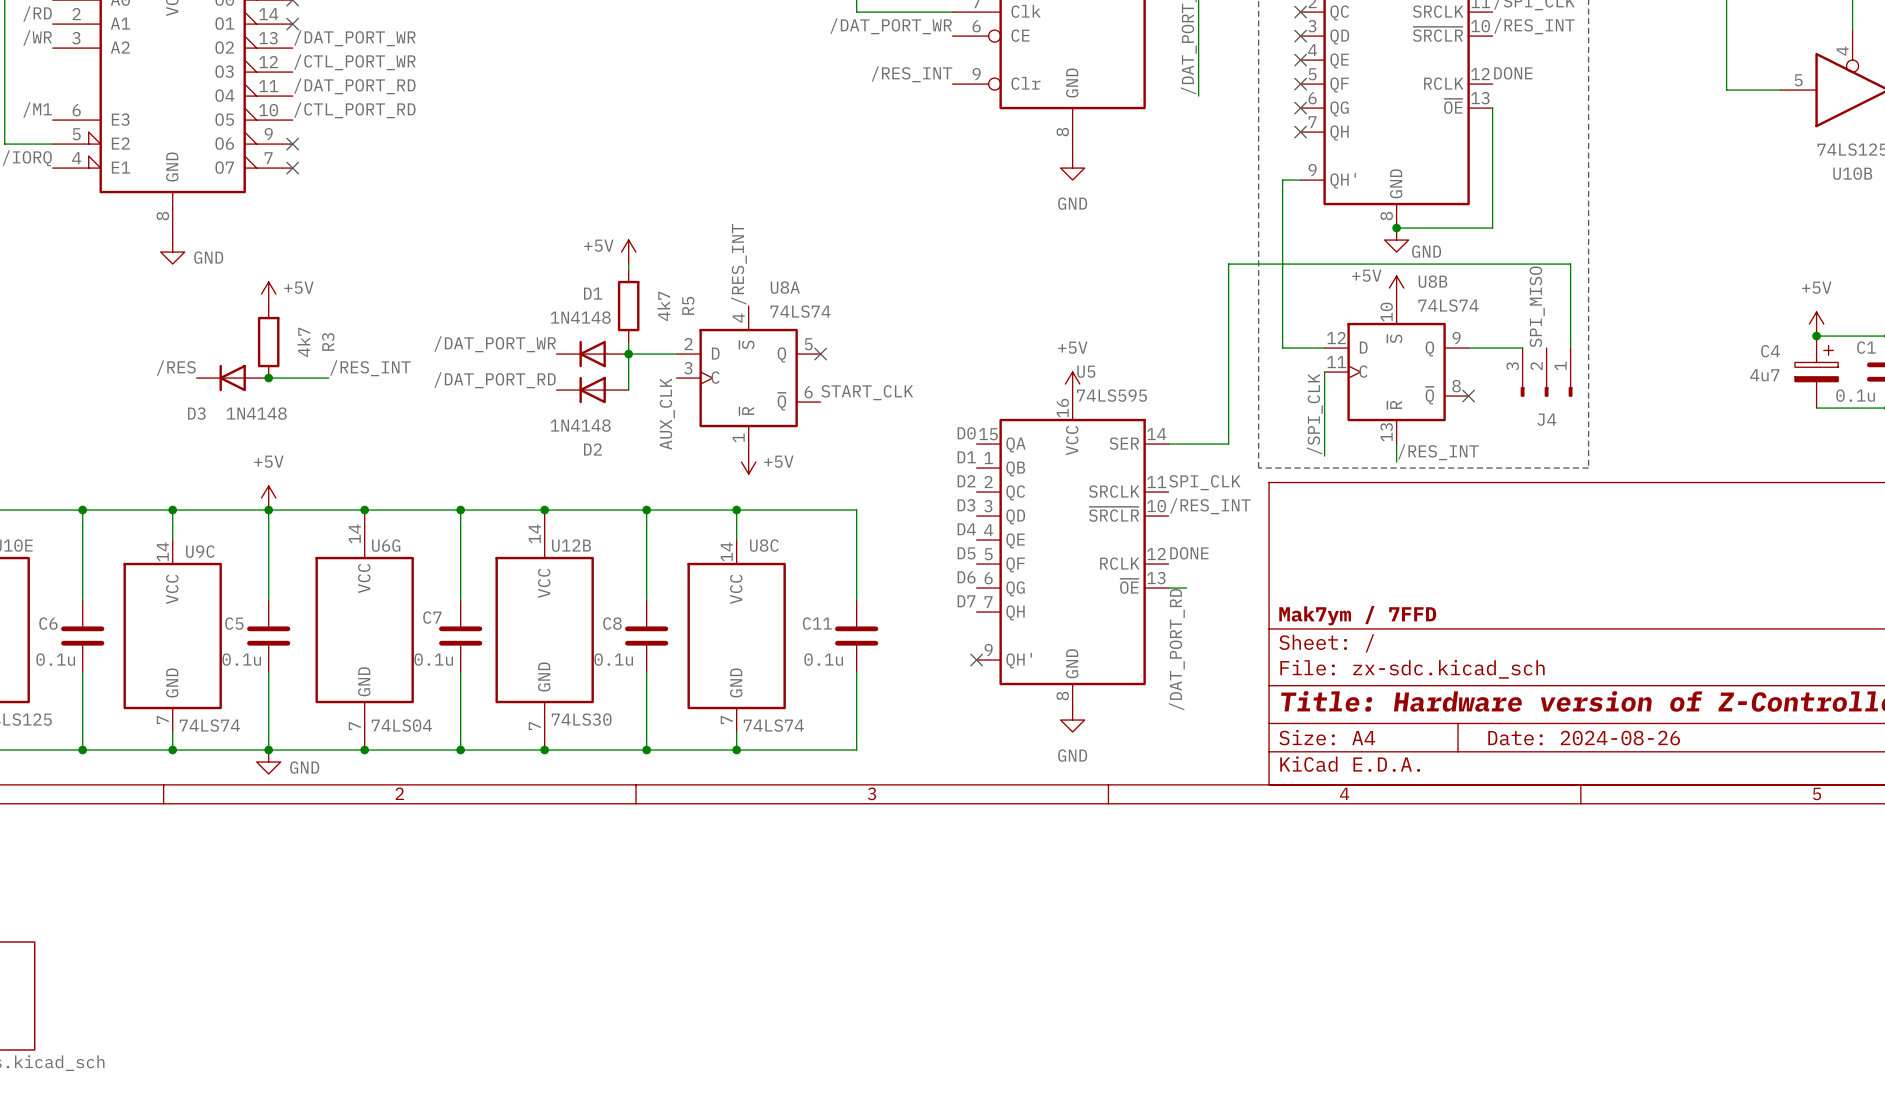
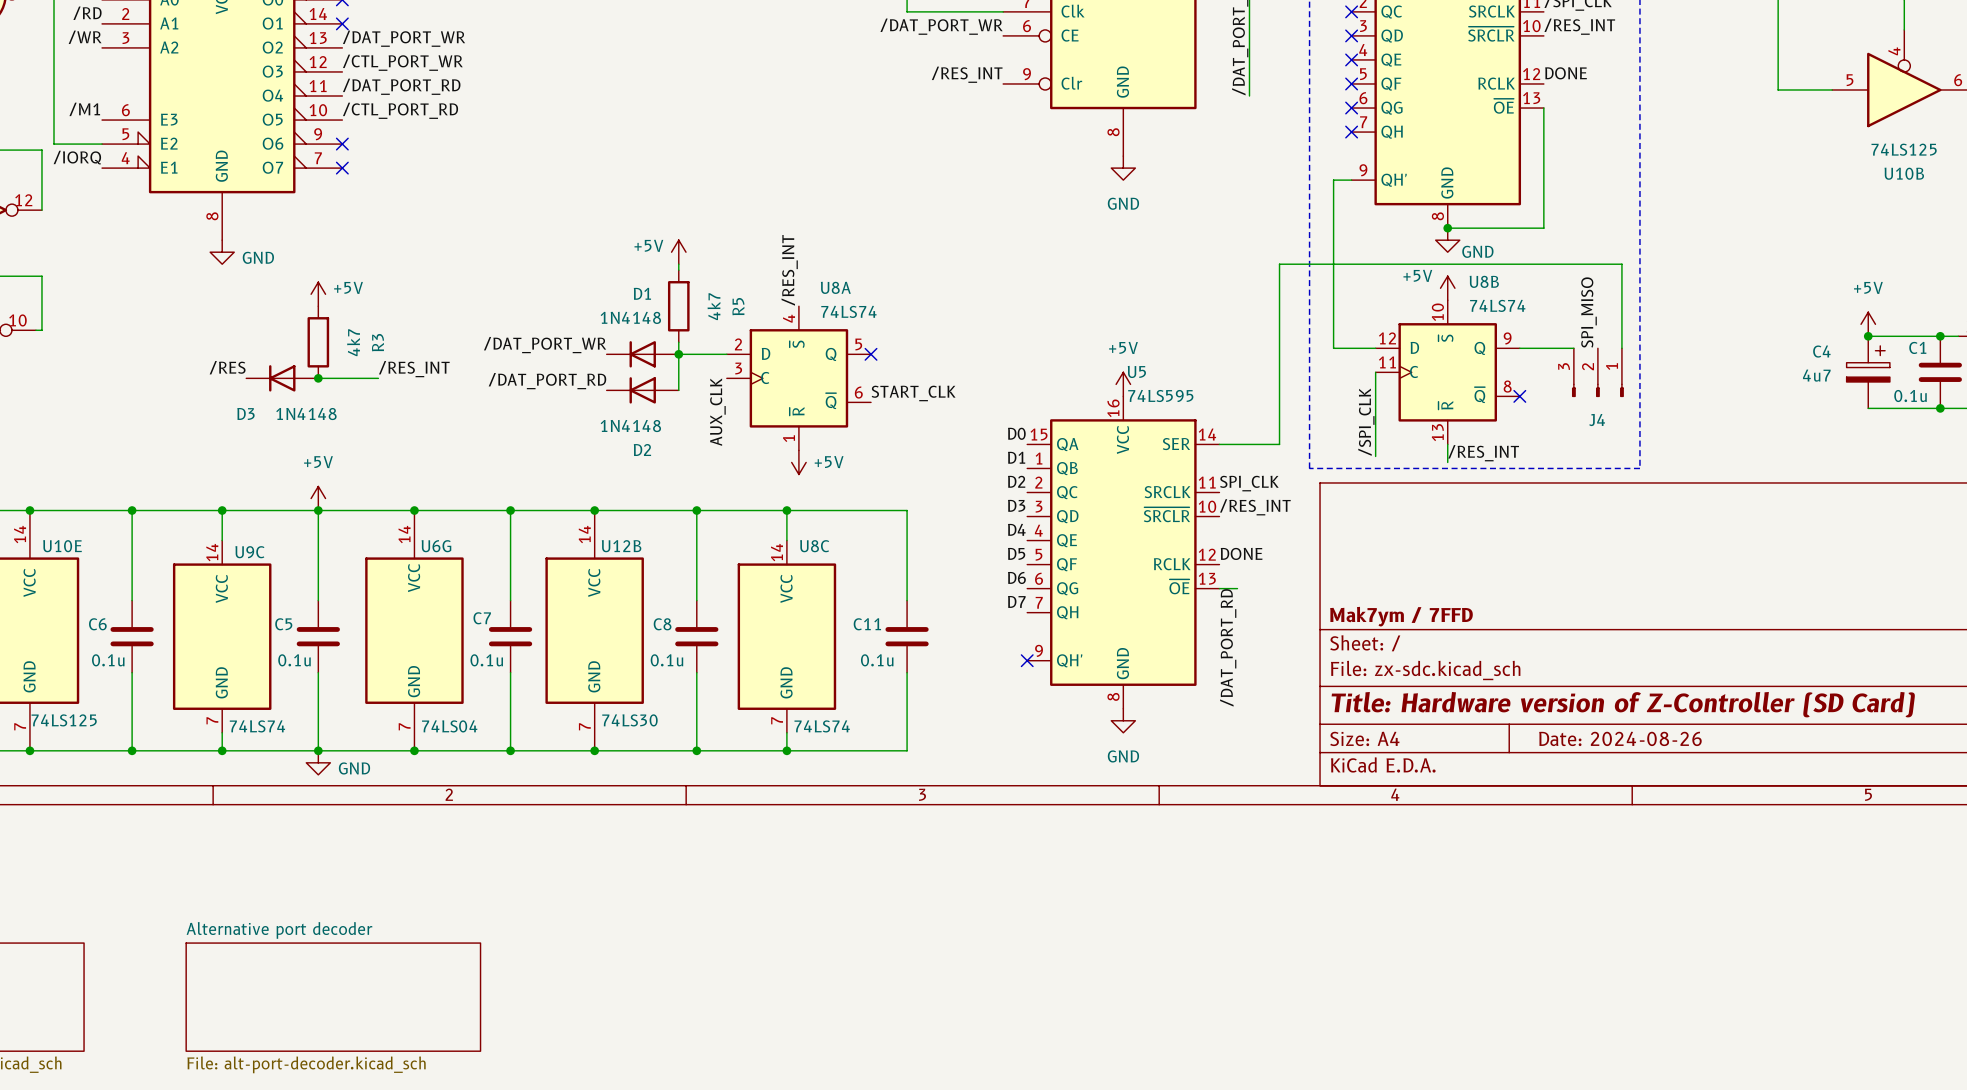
sheet Alternative port decoder: none -> File: alt-port-decoder.kicad_sch (333, 997)

